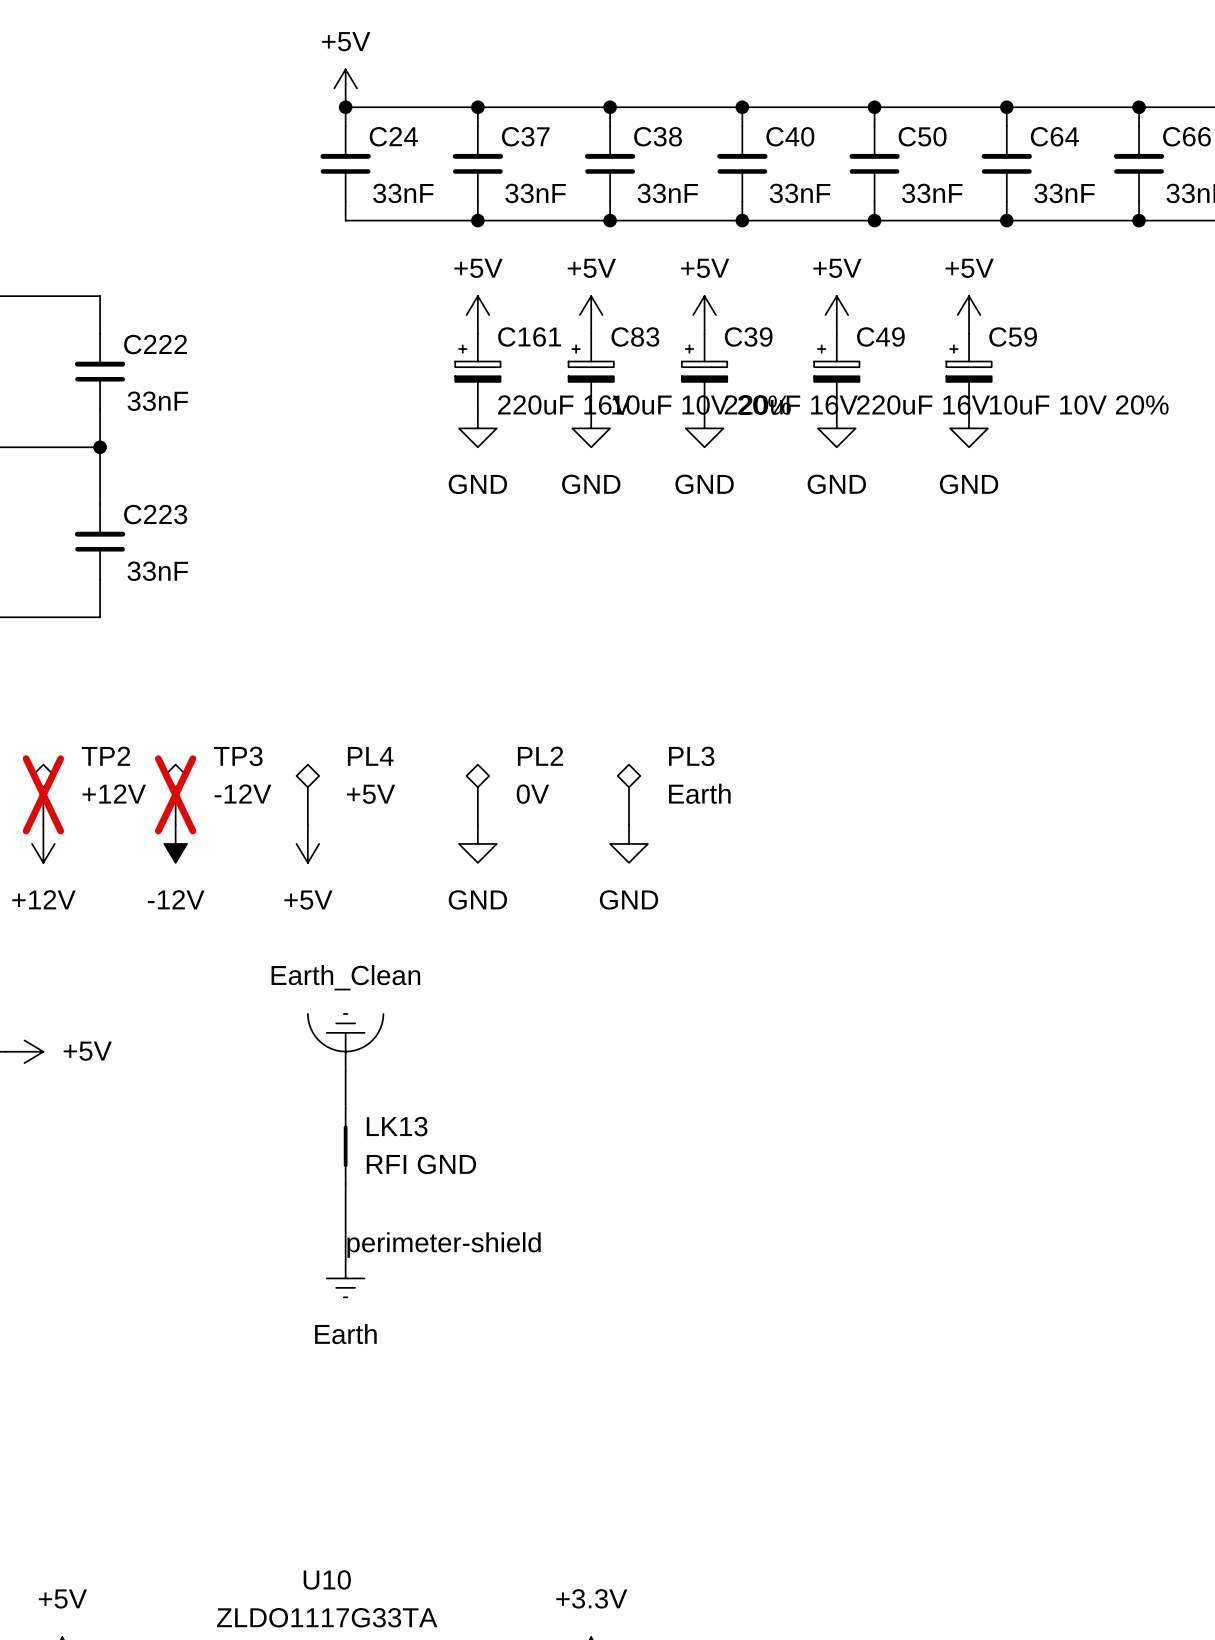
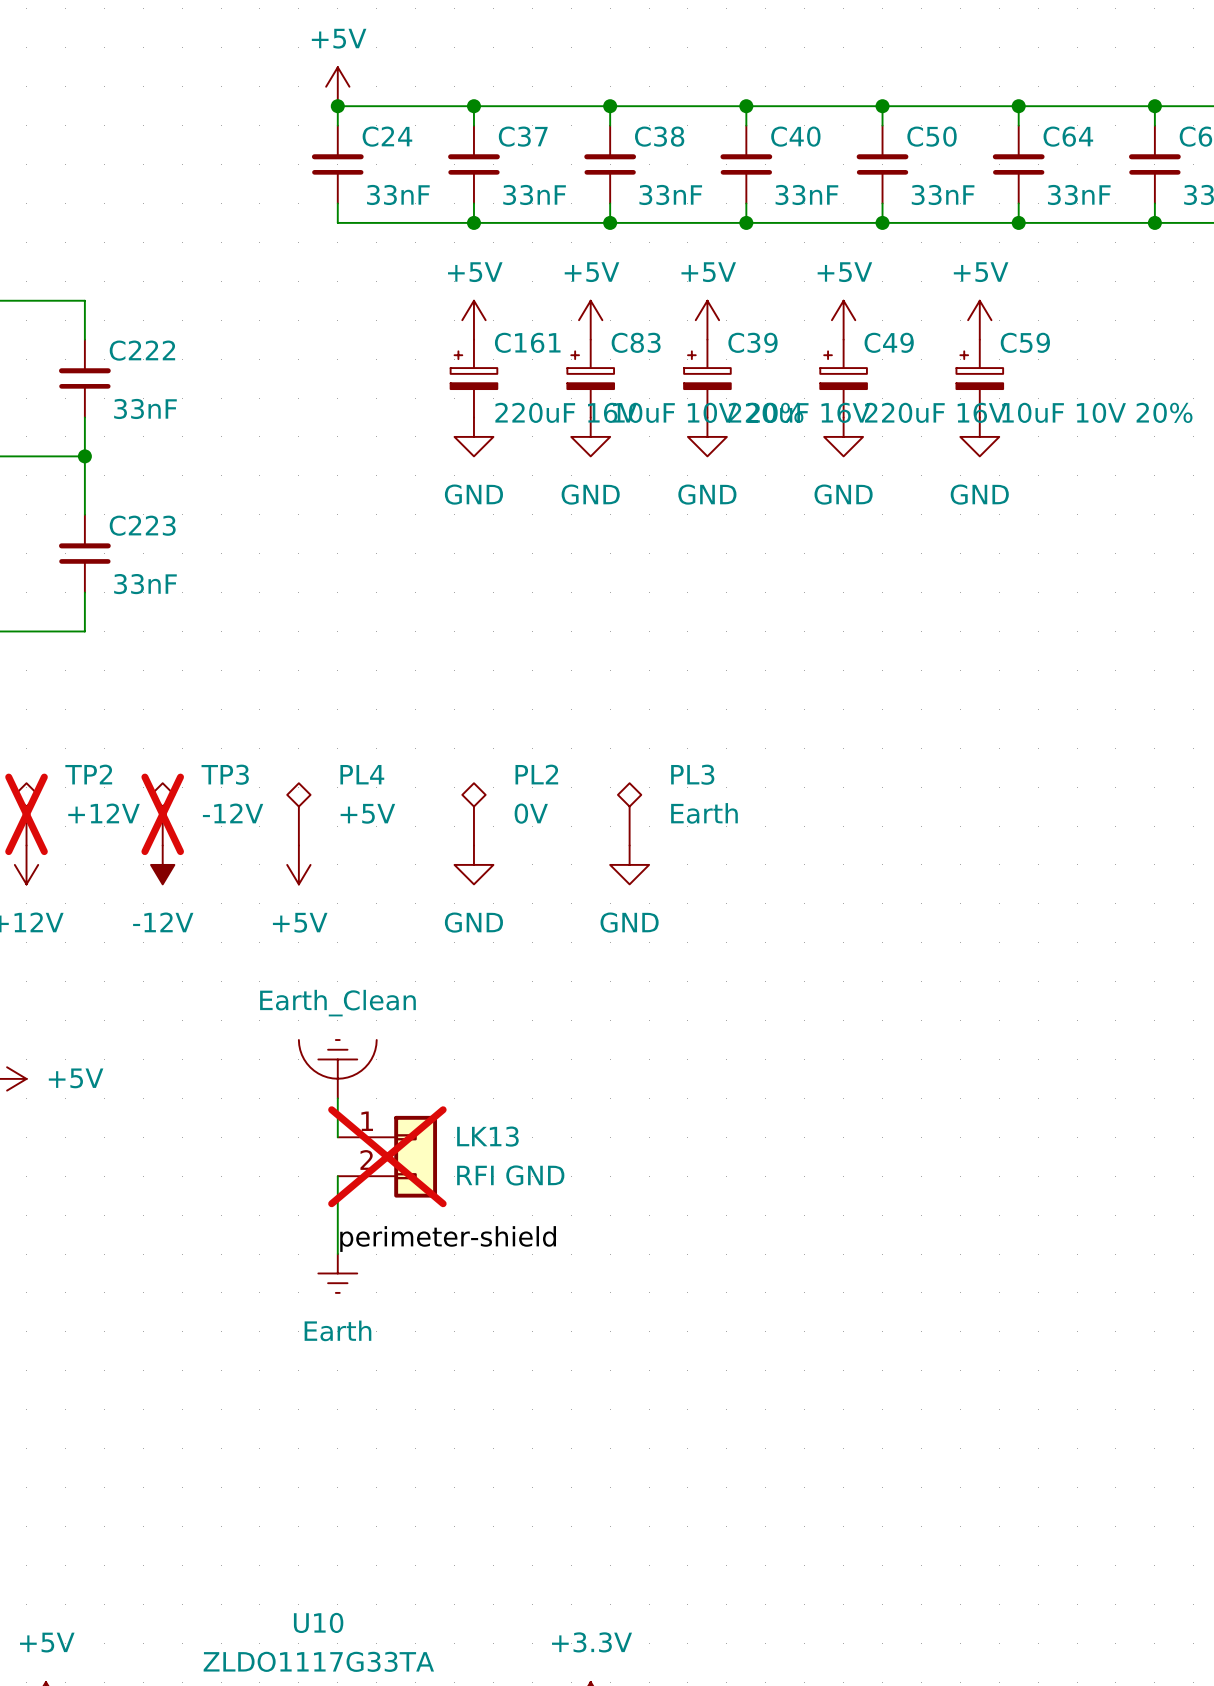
LK13 symbol: [343, 1108, 348, 1184] -> [337, 1115, 438, 1198]
LK13 name position: LK13 (397, 1126) -> LK13 (487, 1136)
LK13 do-not-place cross: none -> (387, 1156)
LK13 value position: RFI GND (421, 1164) -> RFI GND (510, 1175)
label position: perimeter-shield (444, 1245) -> perimeter-shield (448, 1239)
power symbol position: Earth (345, 1278) -> Earth (337, 1273)

